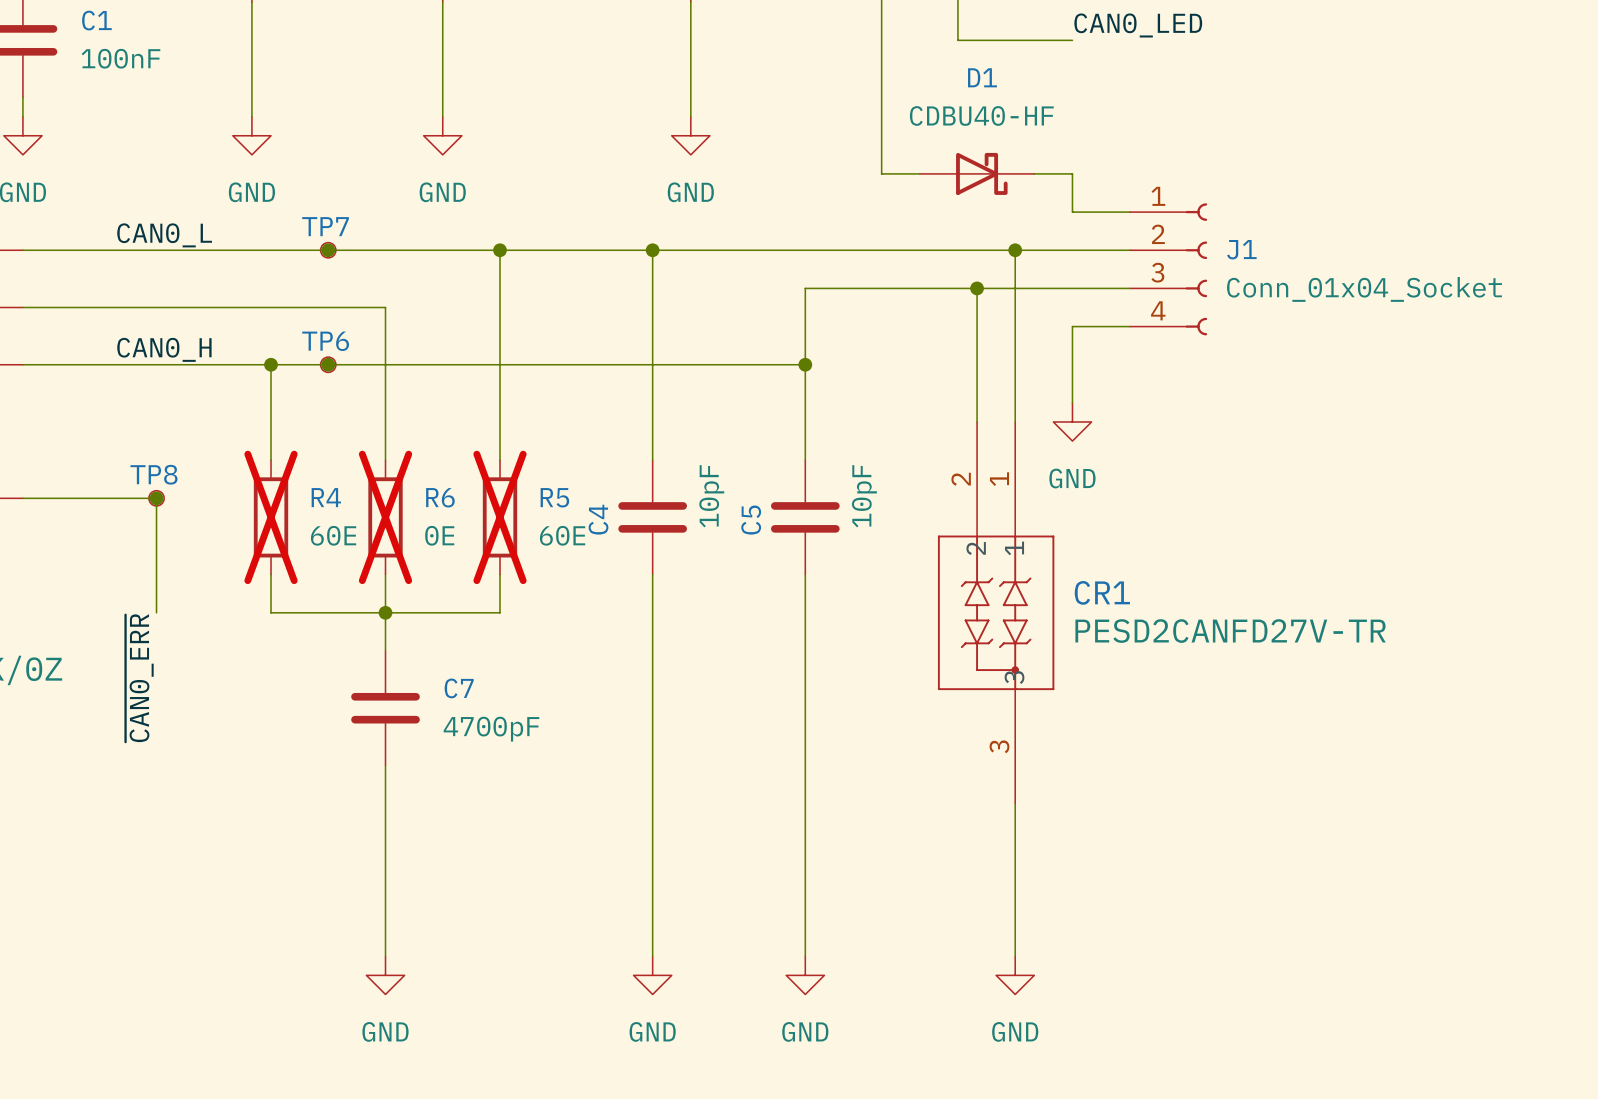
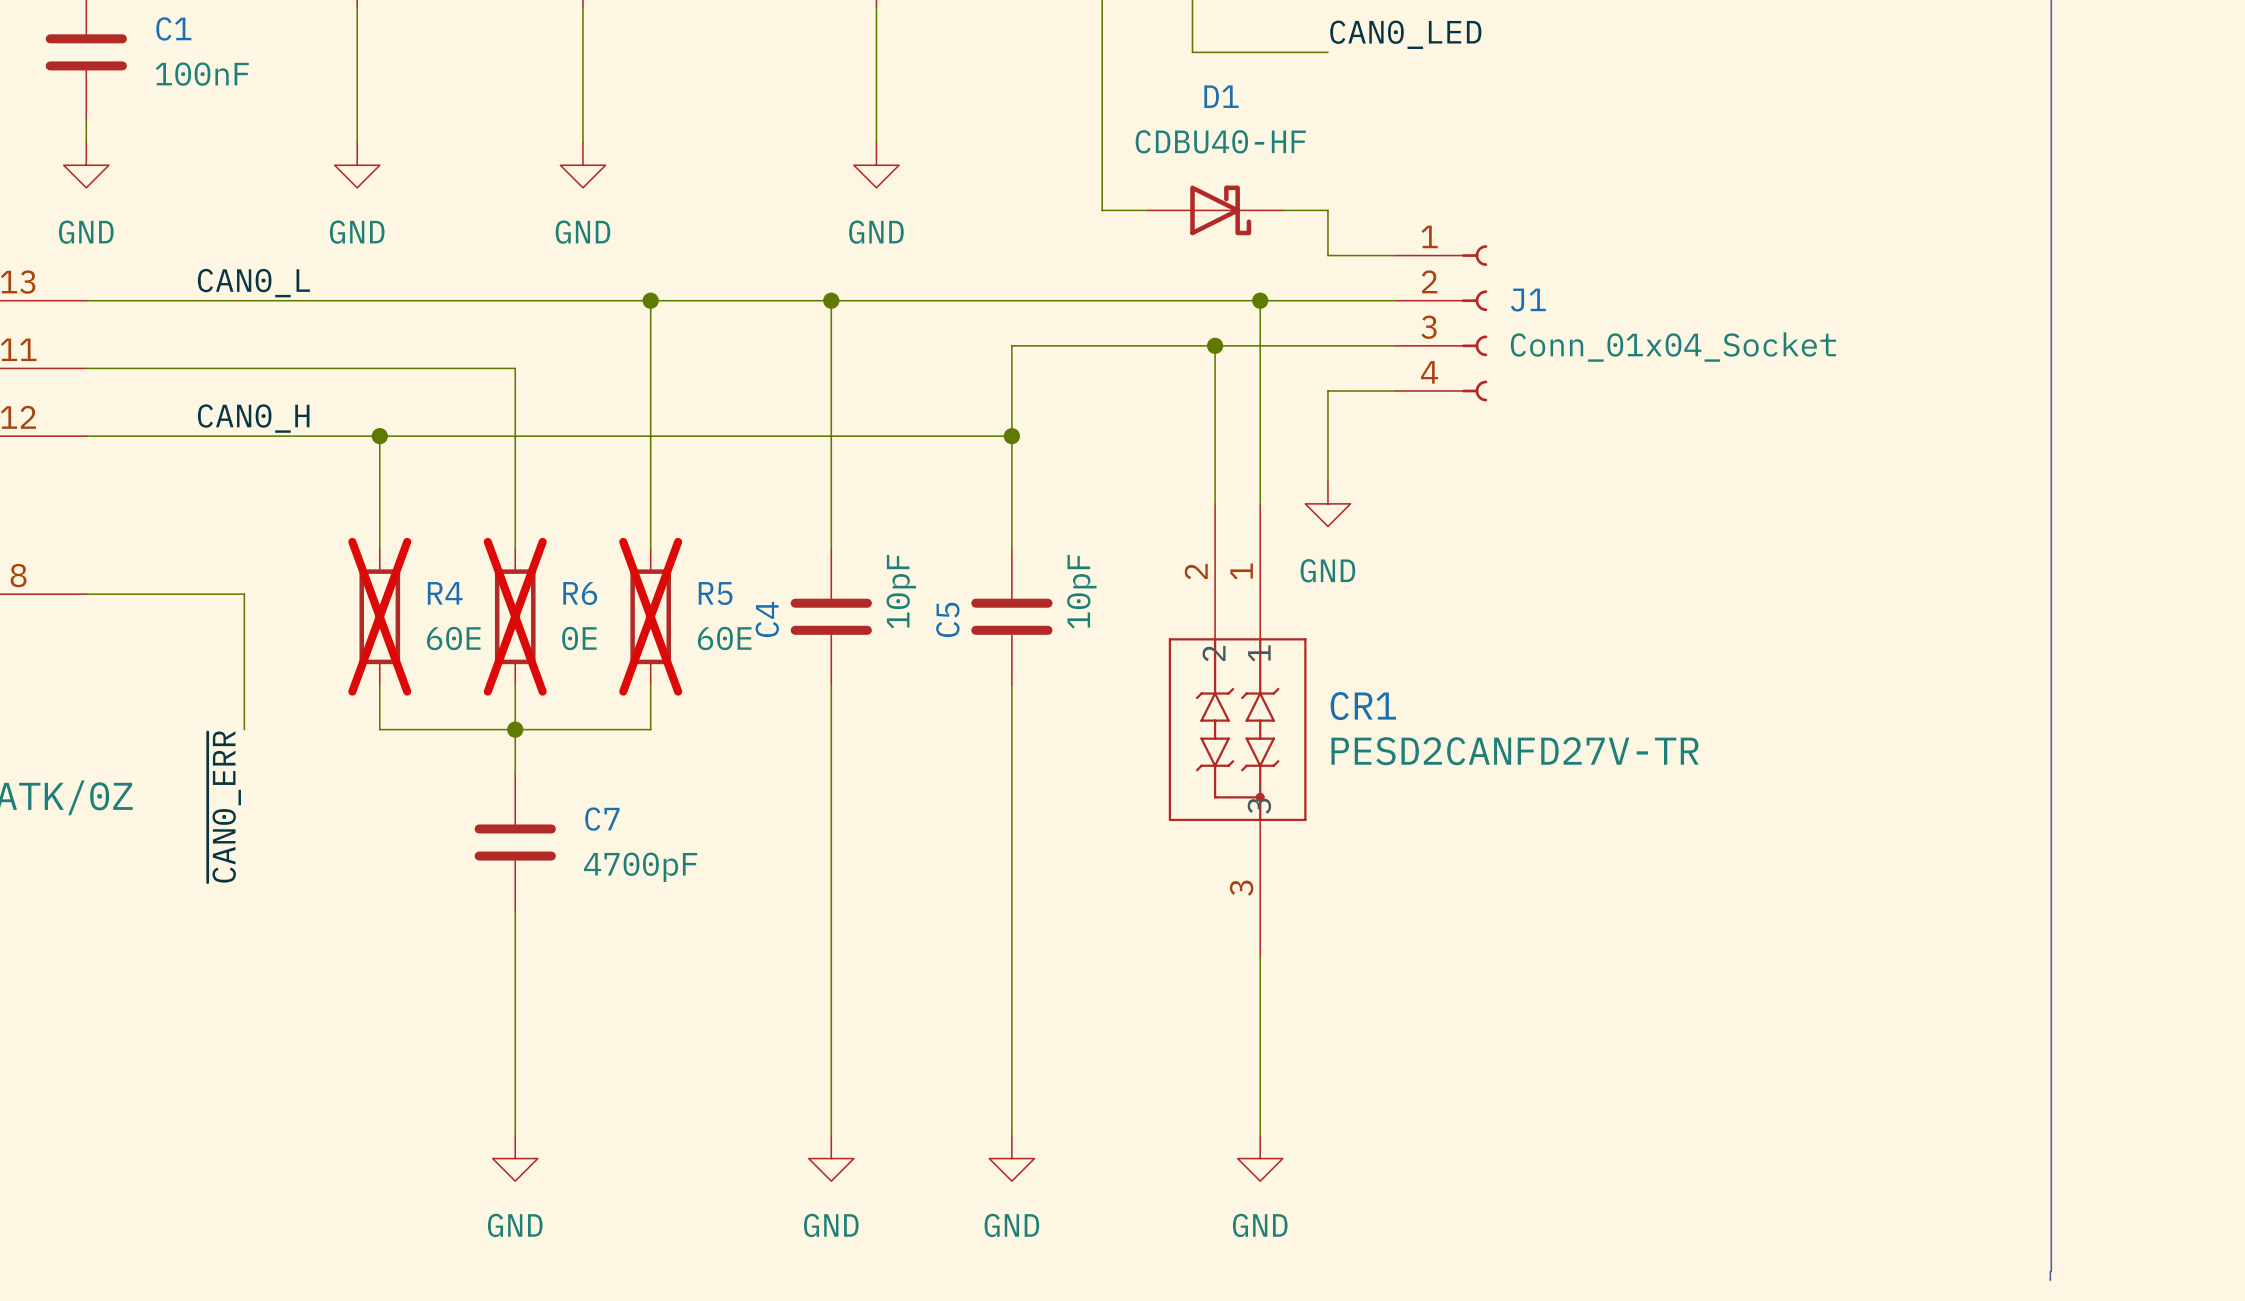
junction: (328, 250) -> none
TP7: (328, 250) -> none
junction: (328, 364) -> none
TP6: (328, 364) -> none
junction: (156, 498) -> none
TP8: (156, 498) -> none

